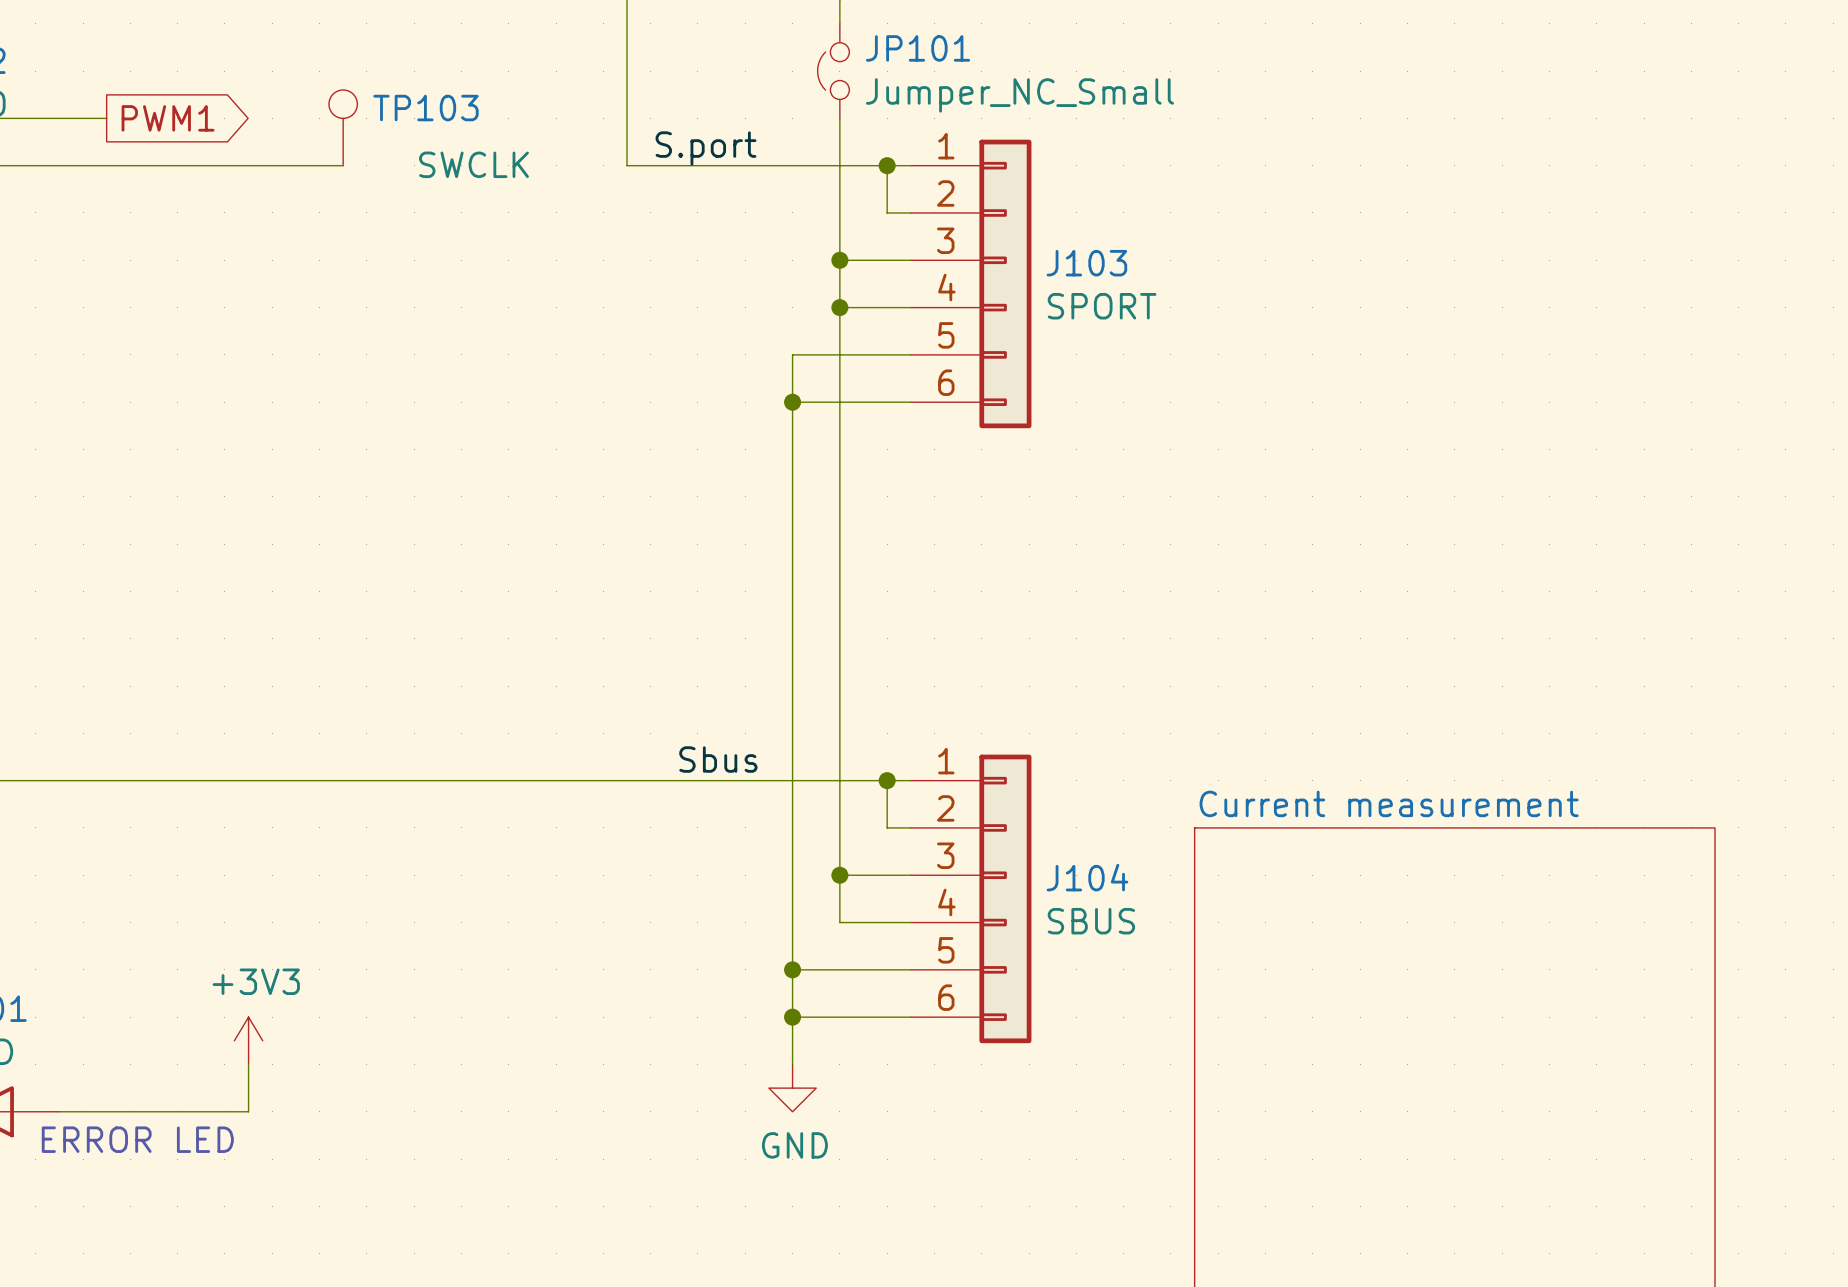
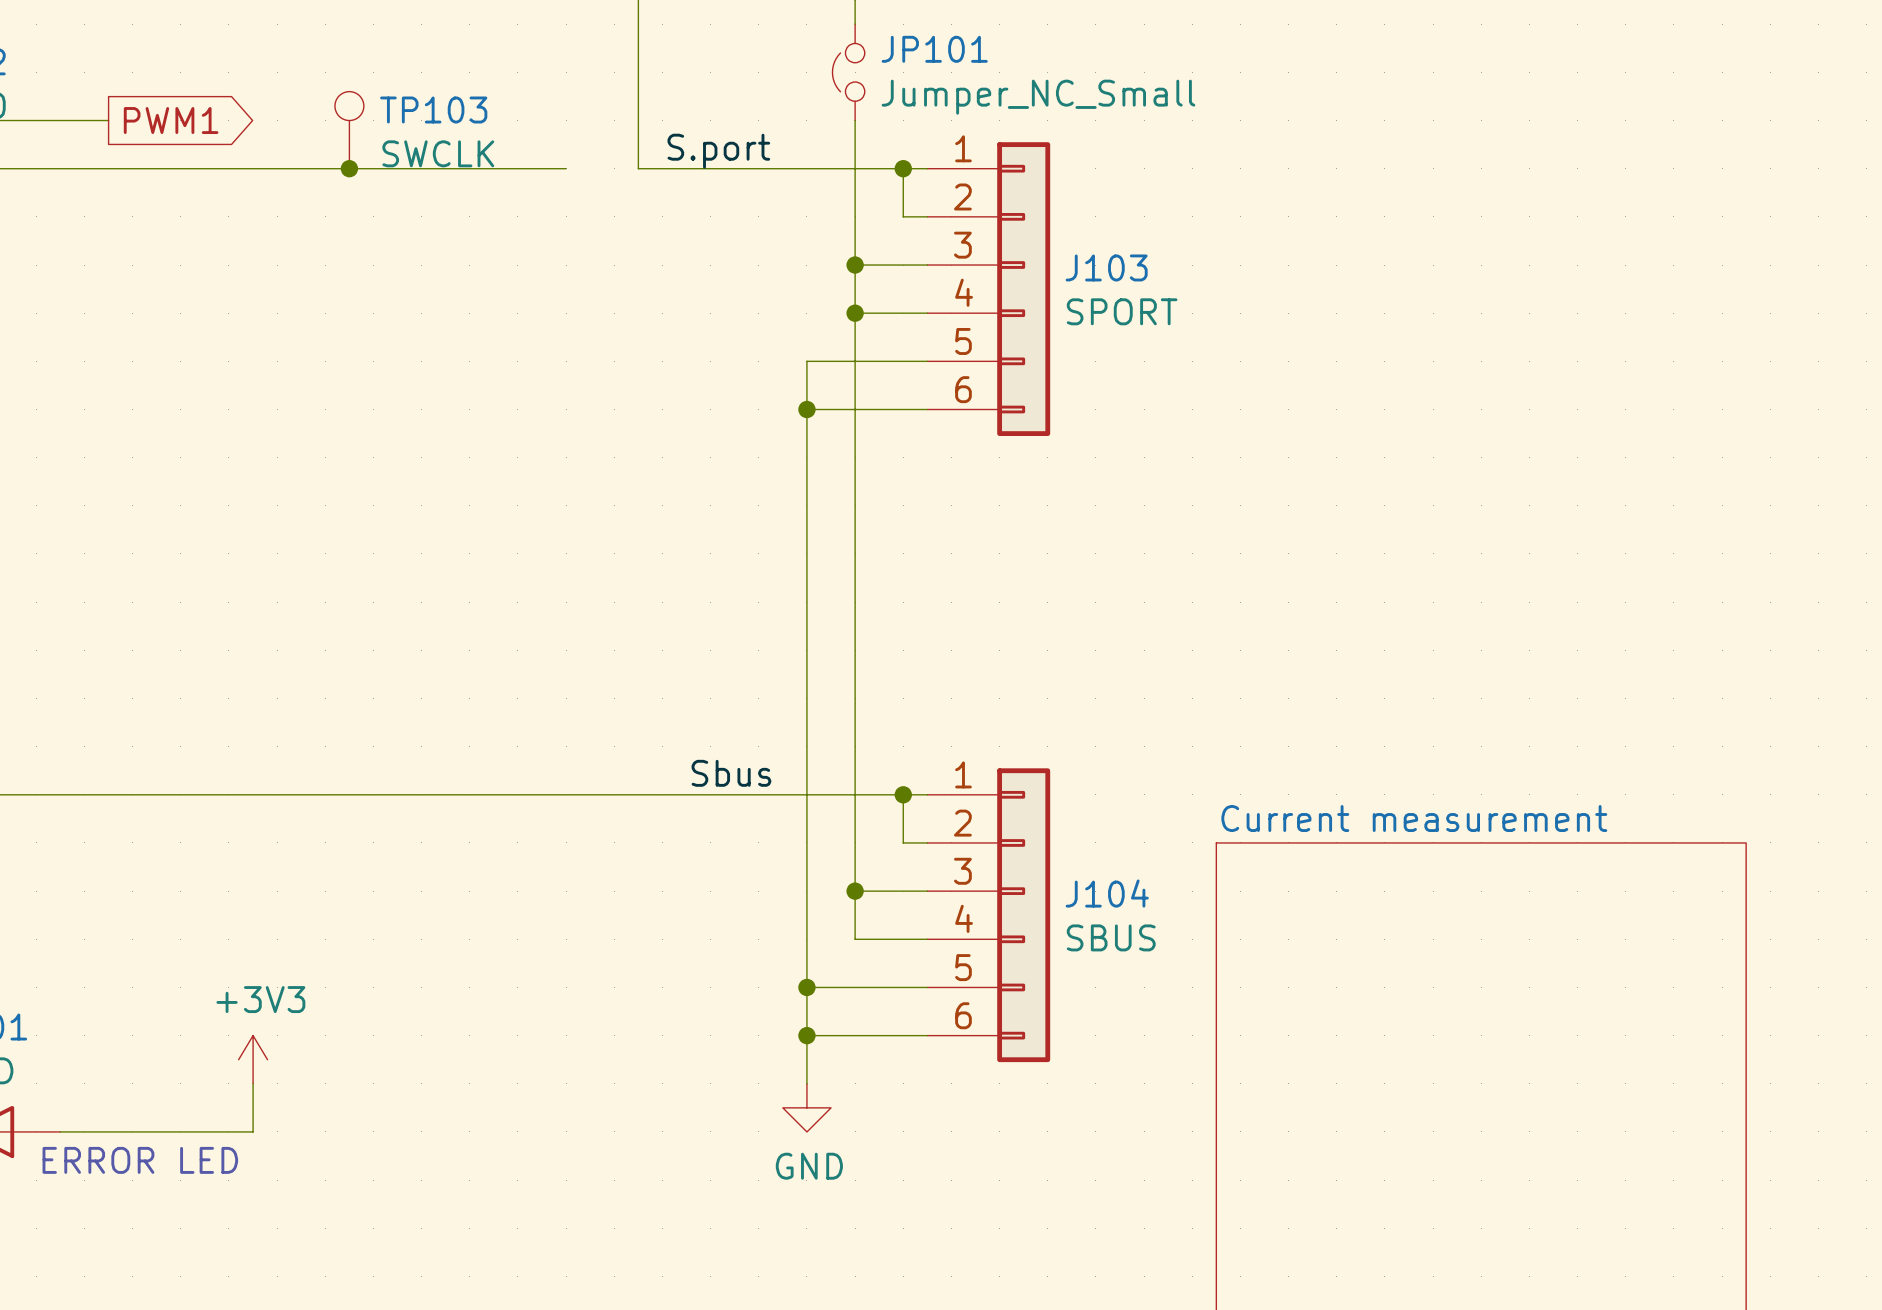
TP103 value position: SWCLK (474, 164) -> SWCLK (438, 153)
wire: none -> (349, 168) (566, 168)
junction: none -> (349, 168)

